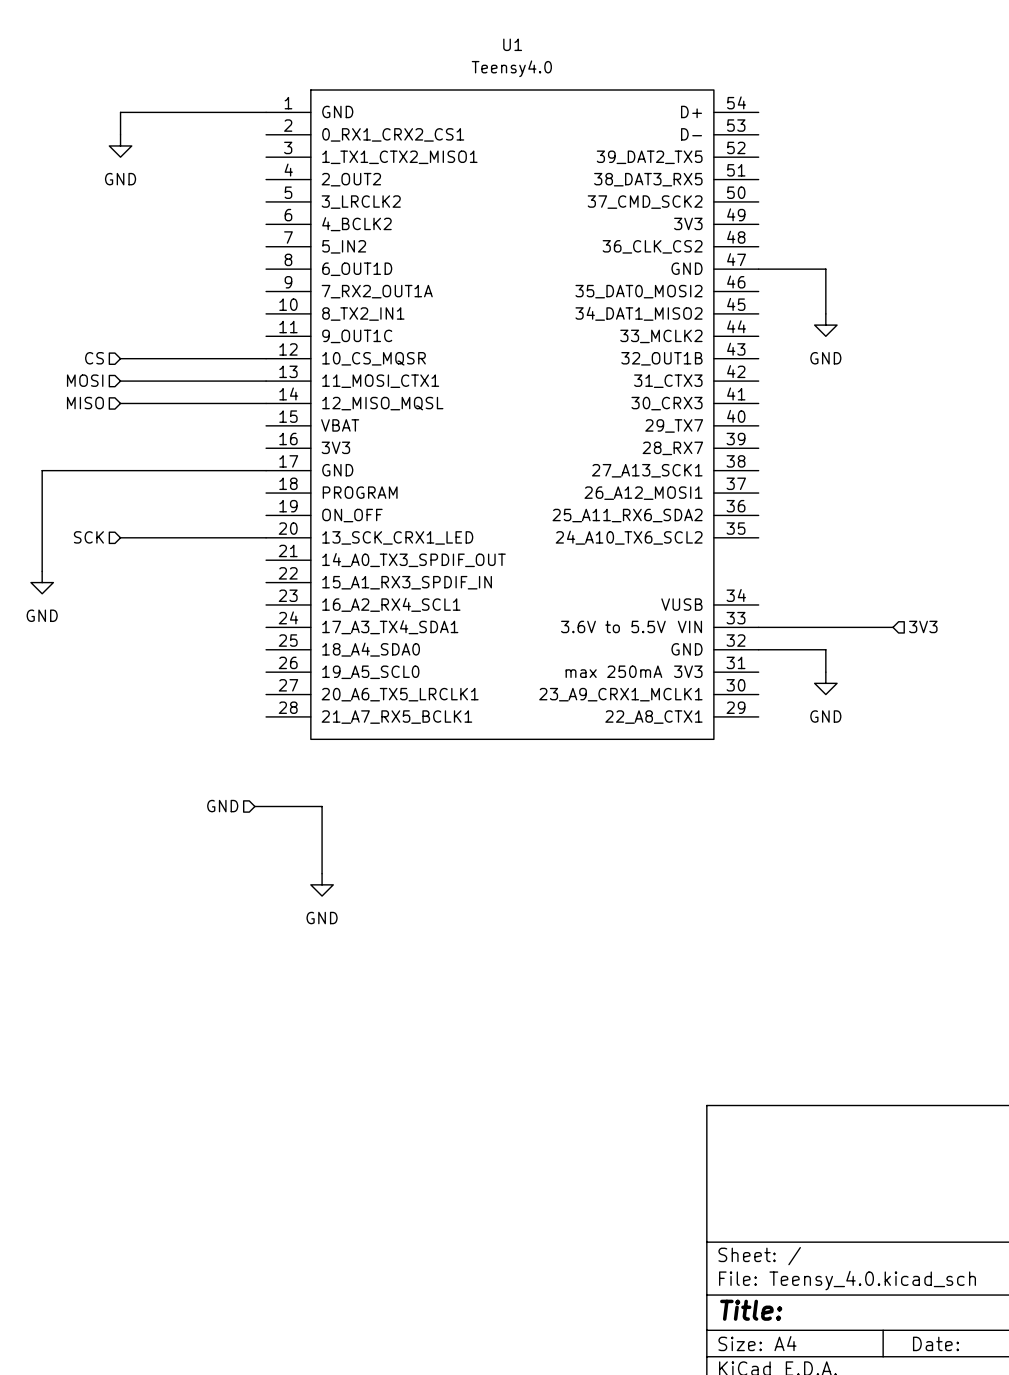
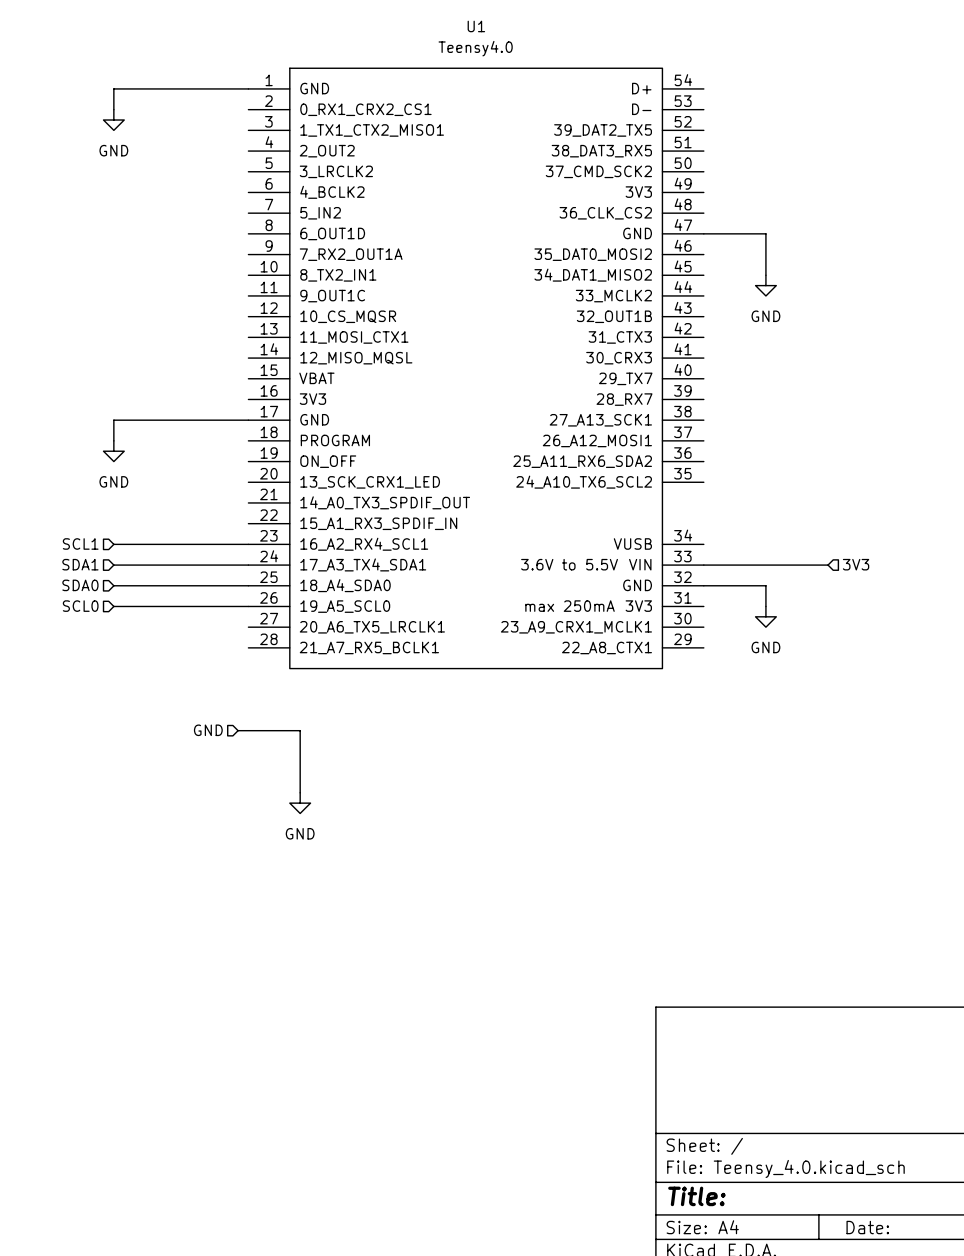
hierarchical label: CS (94, 358) -> none
wire: (120, 358) (266, 358) -> none
hierarchical label: MOSI (85, 380) -> none
wire: (120, 381) (266, 381) -> none
hierarchical label: MISO (85, 403) -> none
wire: (120, 403) (266, 403) -> none
wire: (120, 470) (42, 470) (42, 571) -> (113, 420) (113, 440)
hierarchical label: SCK (88, 537) -> none
wire: (120, 537) (266, 537) -> (113, 544) (248, 544)
power symbol position: GND (42, 582) -> GND (113, 451)
hierarchical label: none -> SCL1 (80, 543)
hierarchical label: none -> SDA1 (80, 564)
wire: none -> (113, 565) (248, 565)
hierarchical label: none -> SDA0 (80, 585)
wire: none -> (113, 585) (248, 585)
hierarchical label: none -> SCL0 (80, 606)
wire: none -> (113, 606) (248, 606)

